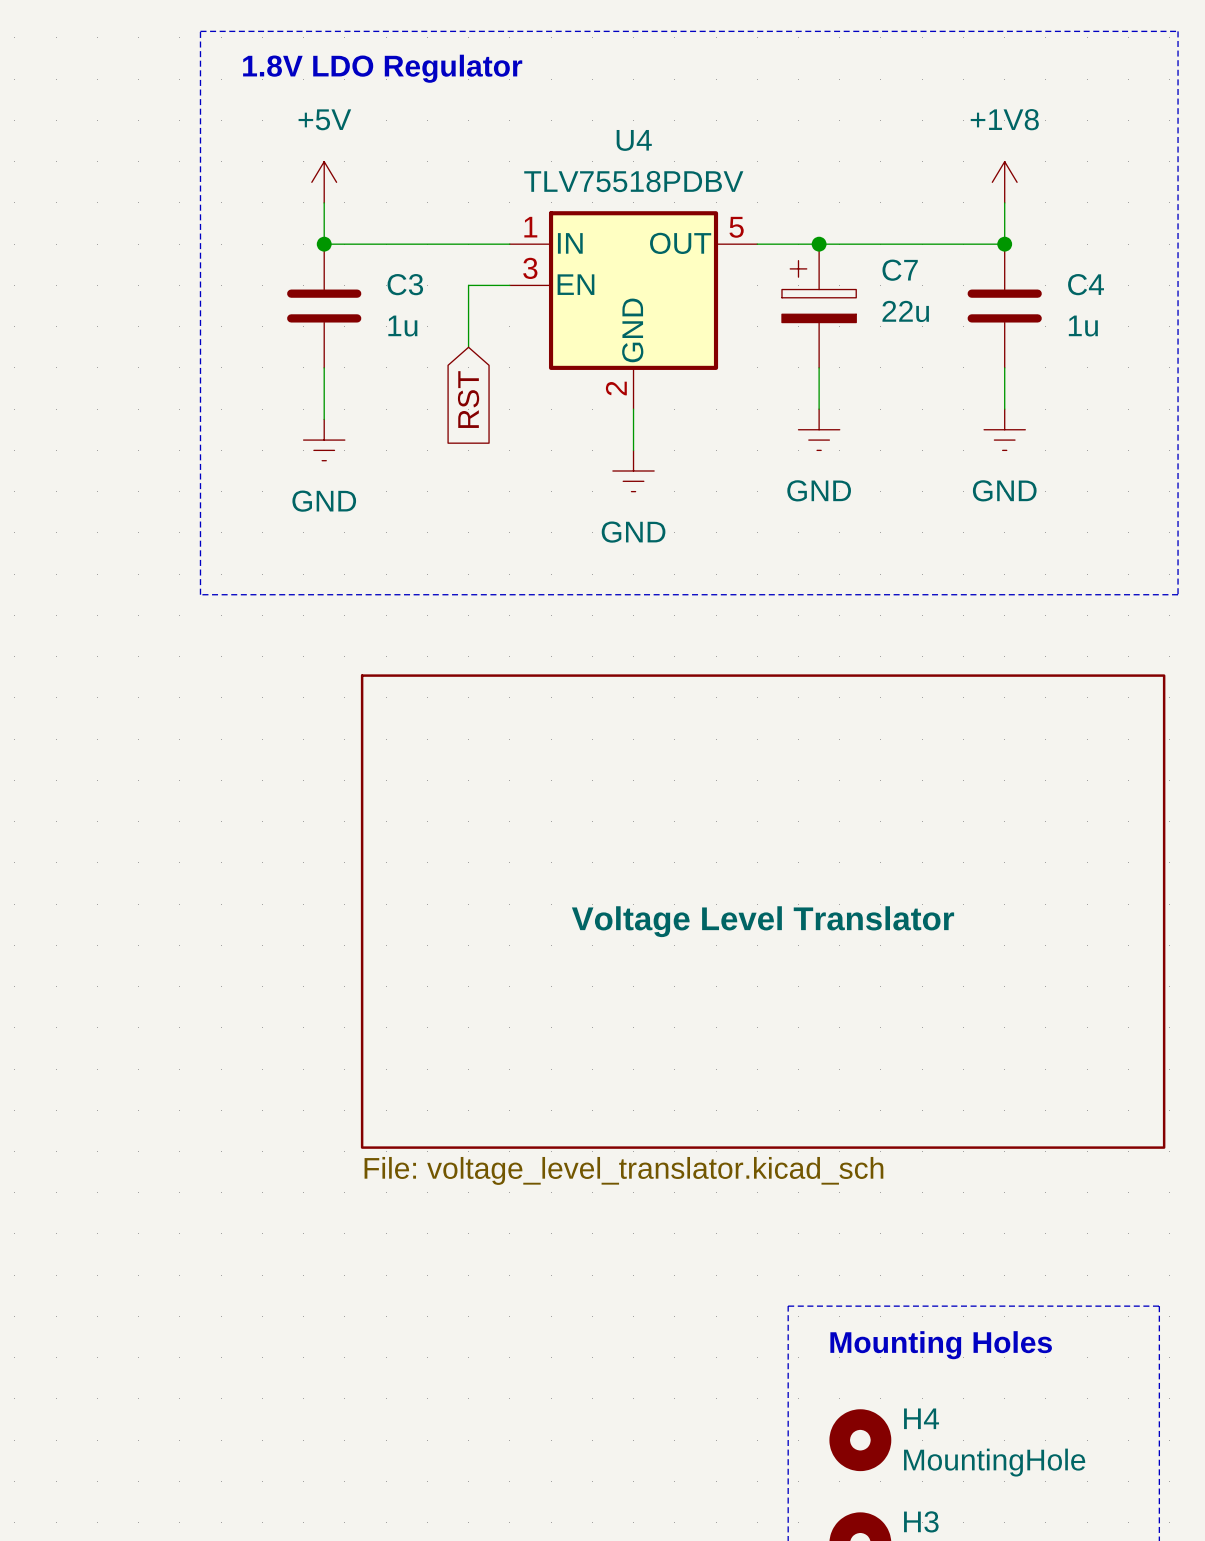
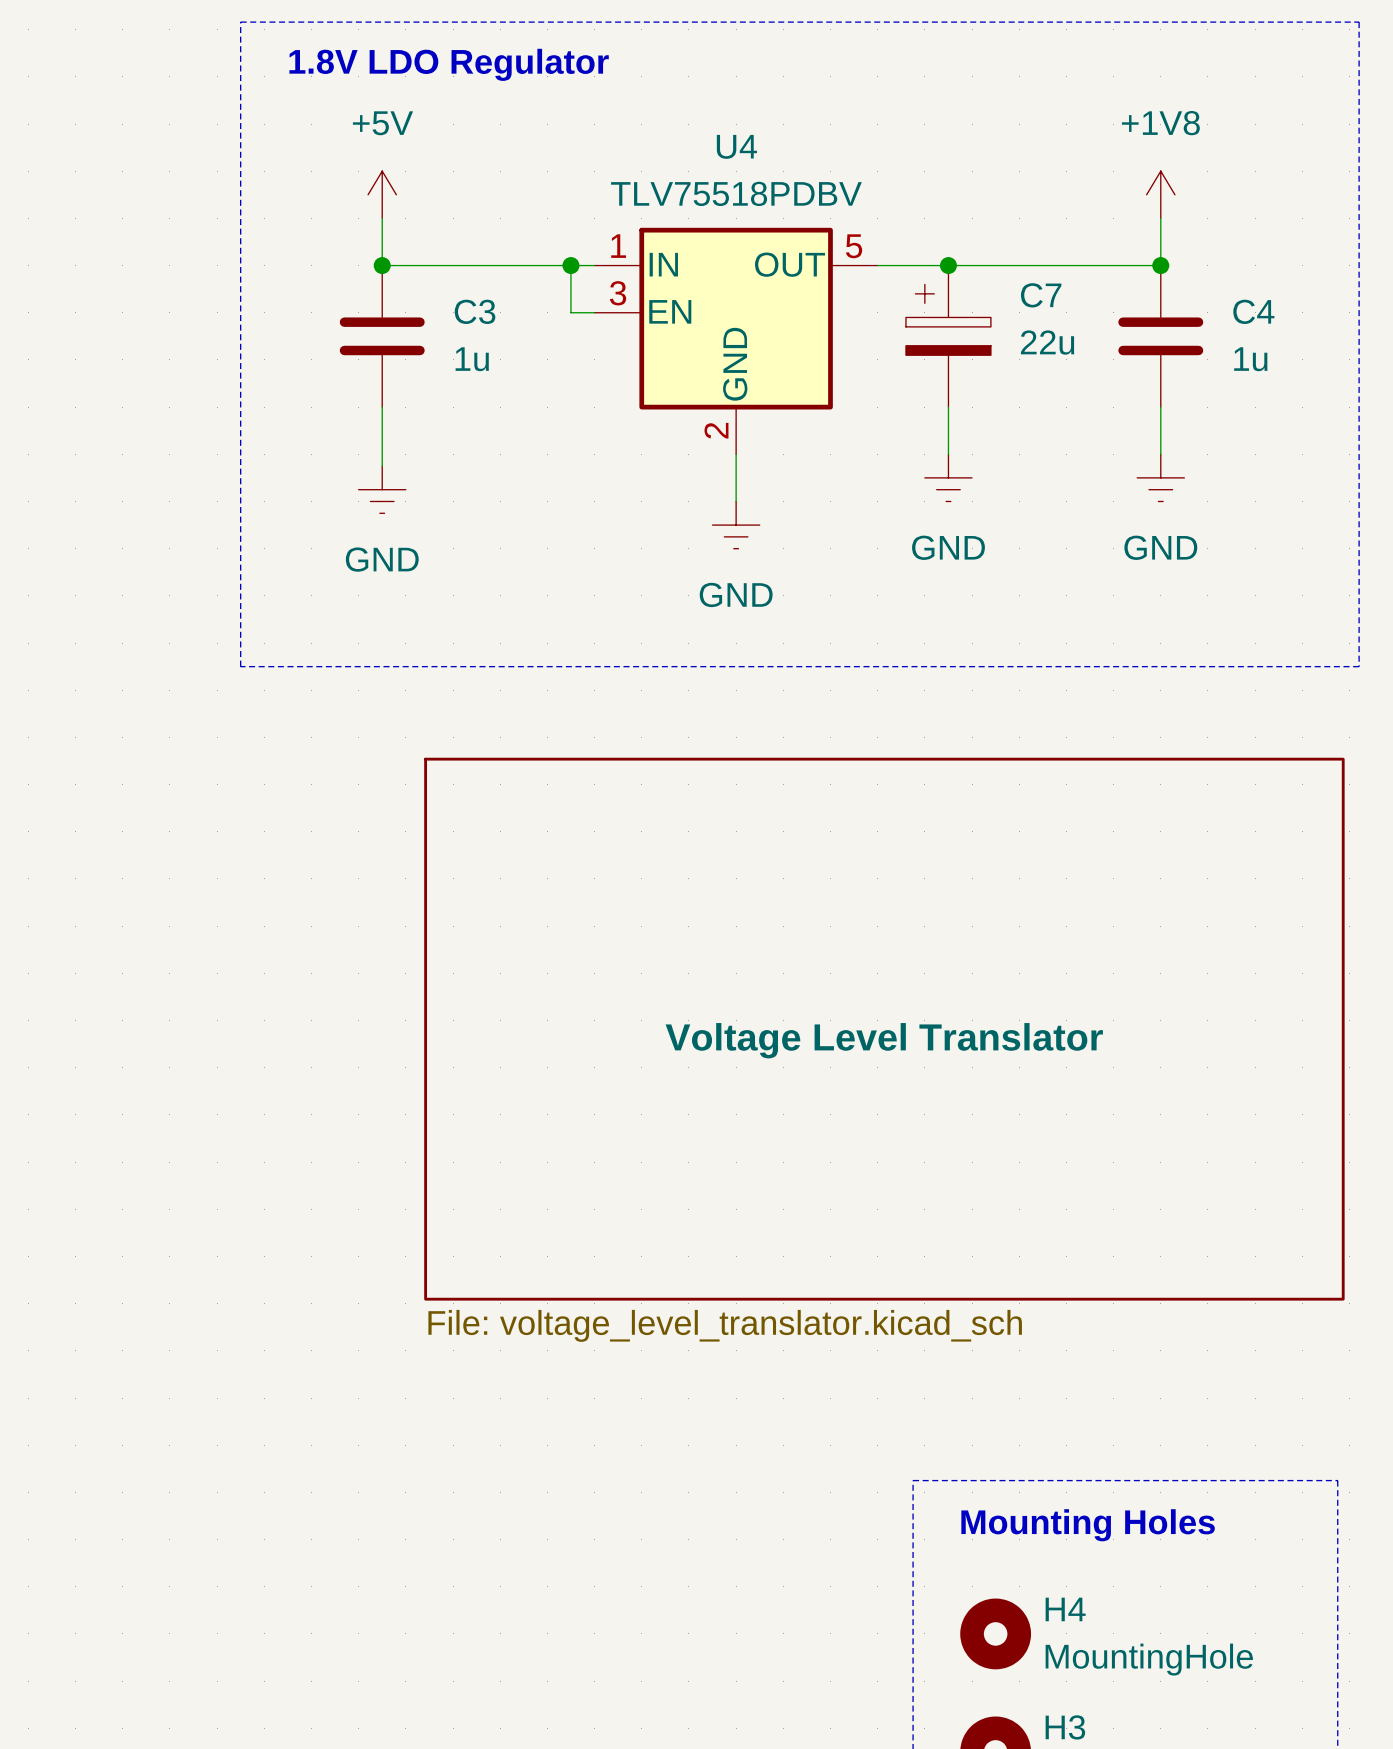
junction: none -> (570, 265)
wire: (489, 285) (468, 285) (468, 347) -> (570, 312) (570, 265)
global label: RST (468, 399) -> none

